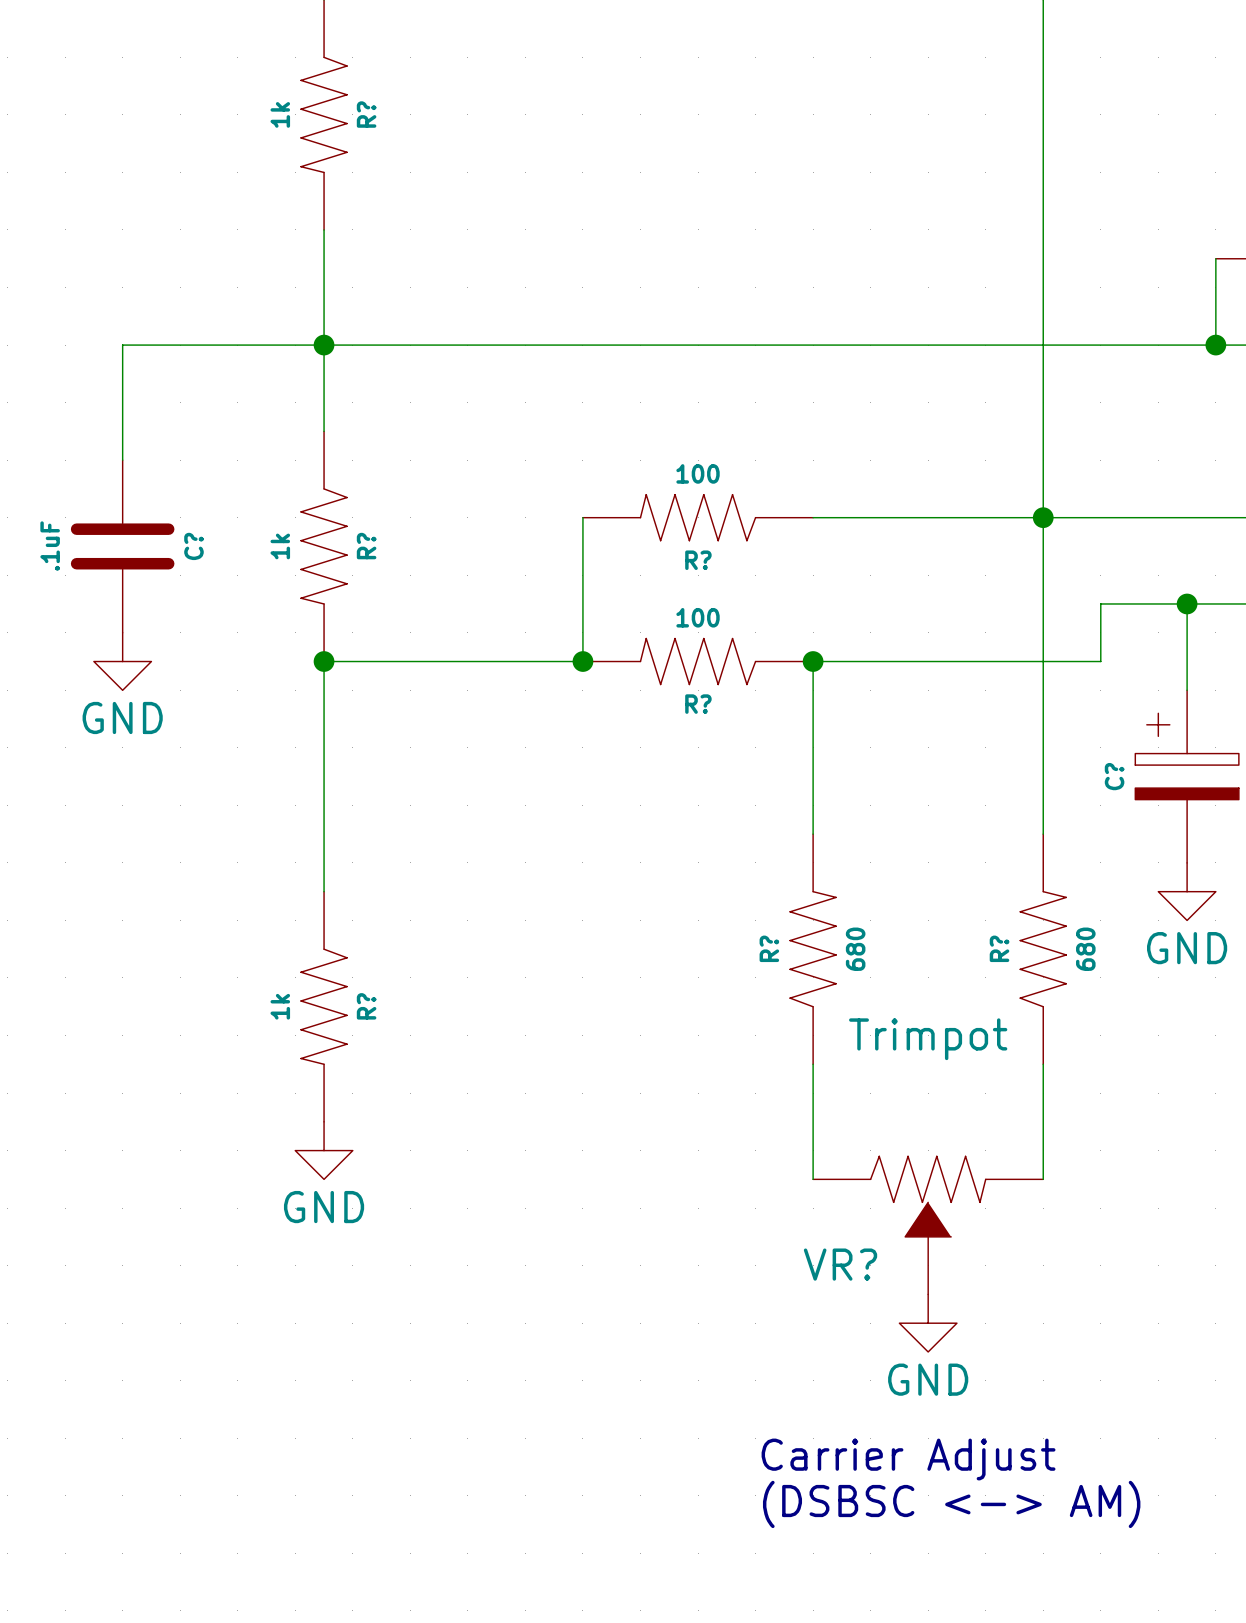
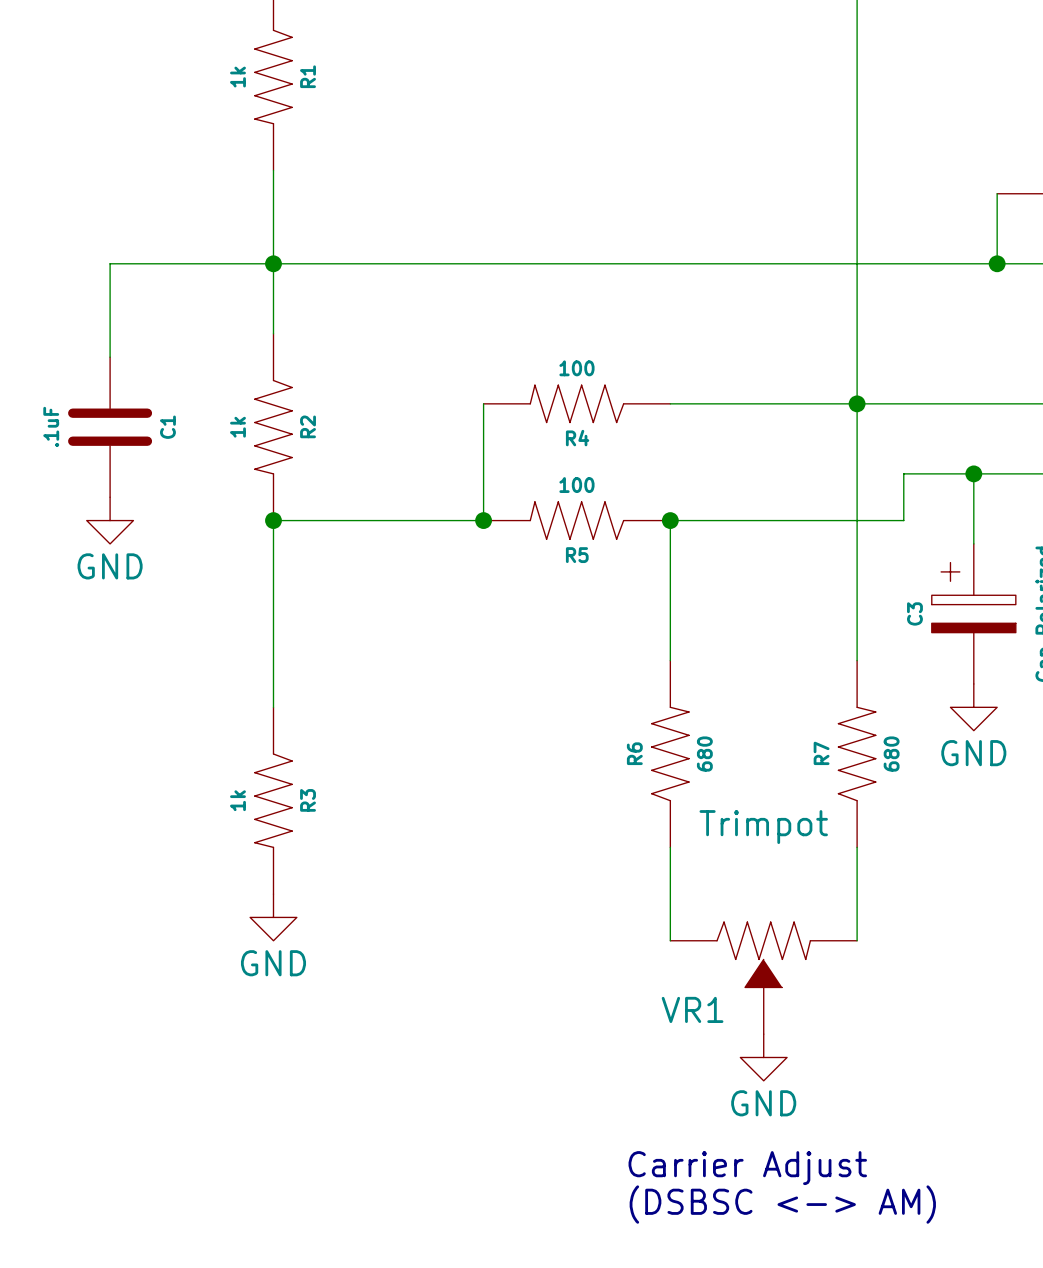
R? name: R? (366, 114) -> R1 (308, 76)
C? name: C? (193, 546) -> C1 (167, 427)
R? name: R? (366, 546) -> R2 (308, 426)
R? name: R? (698, 560) -> R4 (577, 438)
R? name: R? (698, 704) -> R5 (577, 555)
C? name: C? (1114, 776) -> C3 (914, 613)
R? name: R? (769, 948) -> R6 (634, 753)
R? name: R? (999, 948) -> R7 (821, 753)
R? name: R? (366, 1006) -> R3 (308, 800)
VR? name: VR? (840, 1264) -> VR1 (692, 1009)

